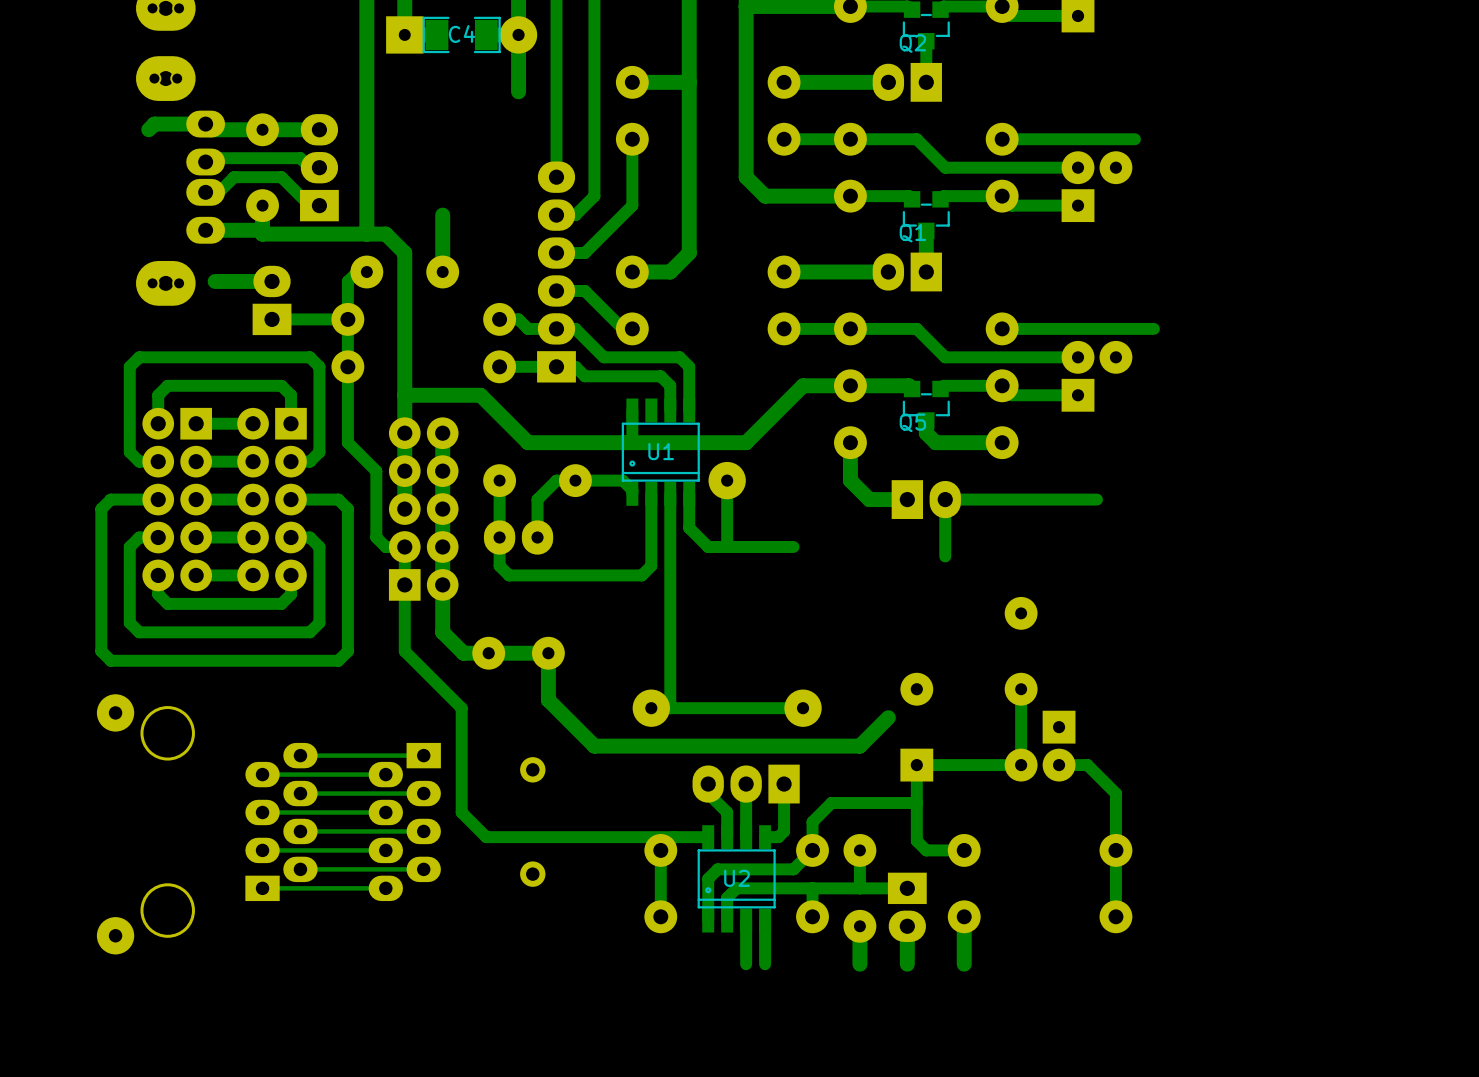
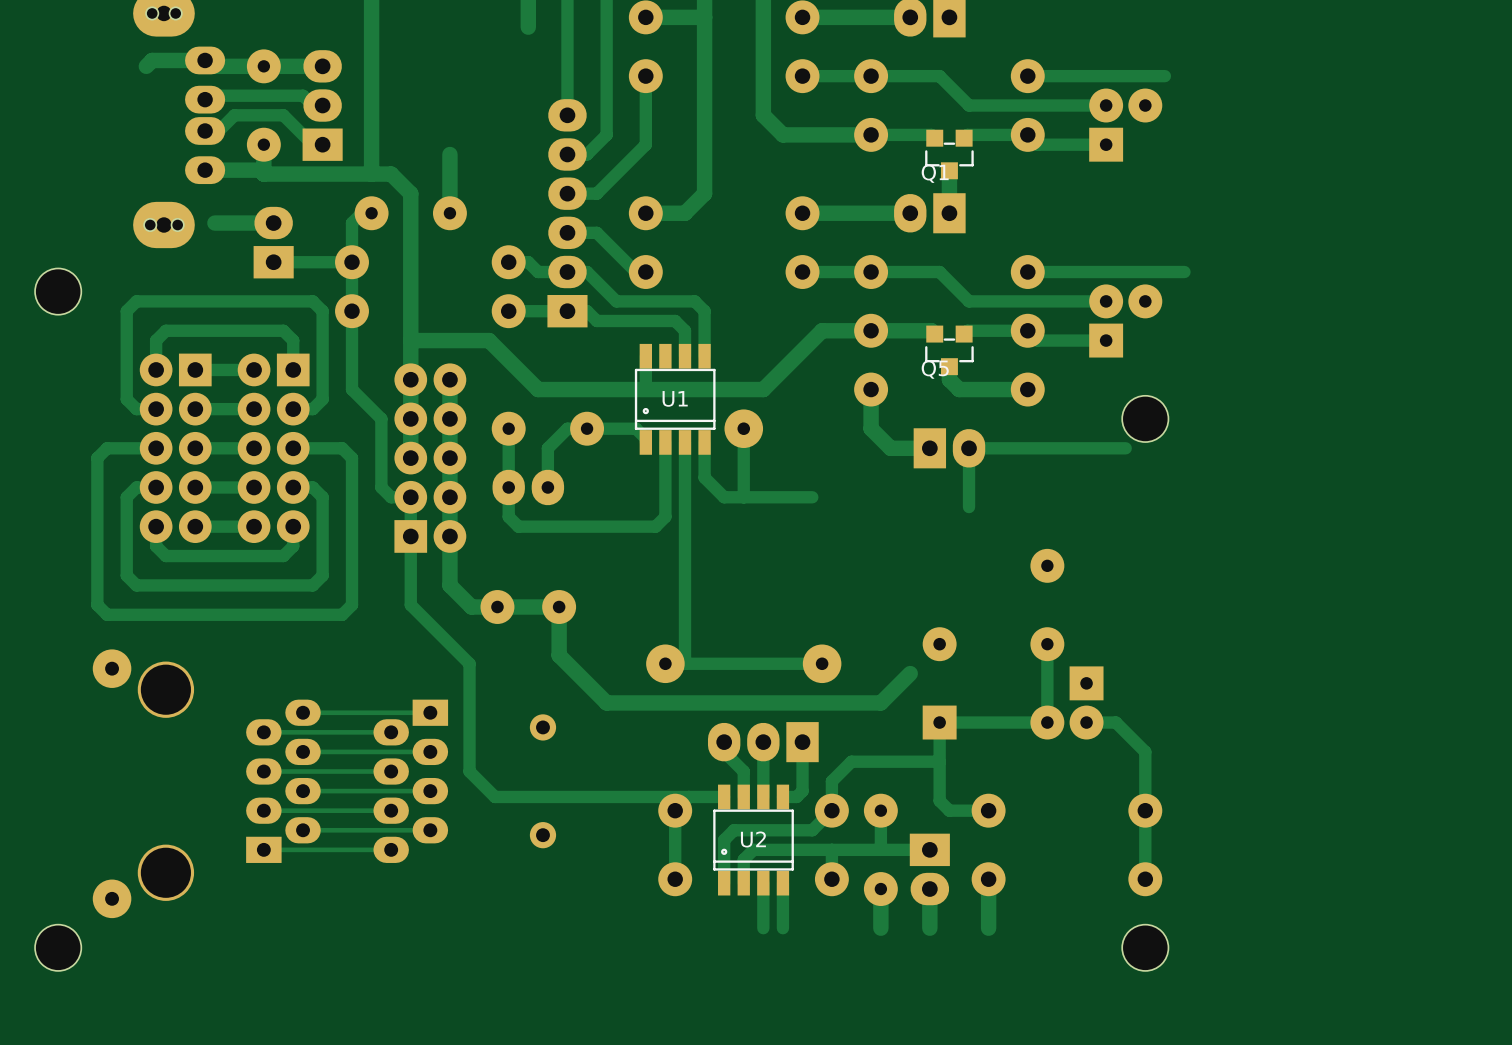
part: none -> (58, 291)
part: none -> (1145, 418)
part: none -> (58, 947)
part: none -> (1145, 947)

